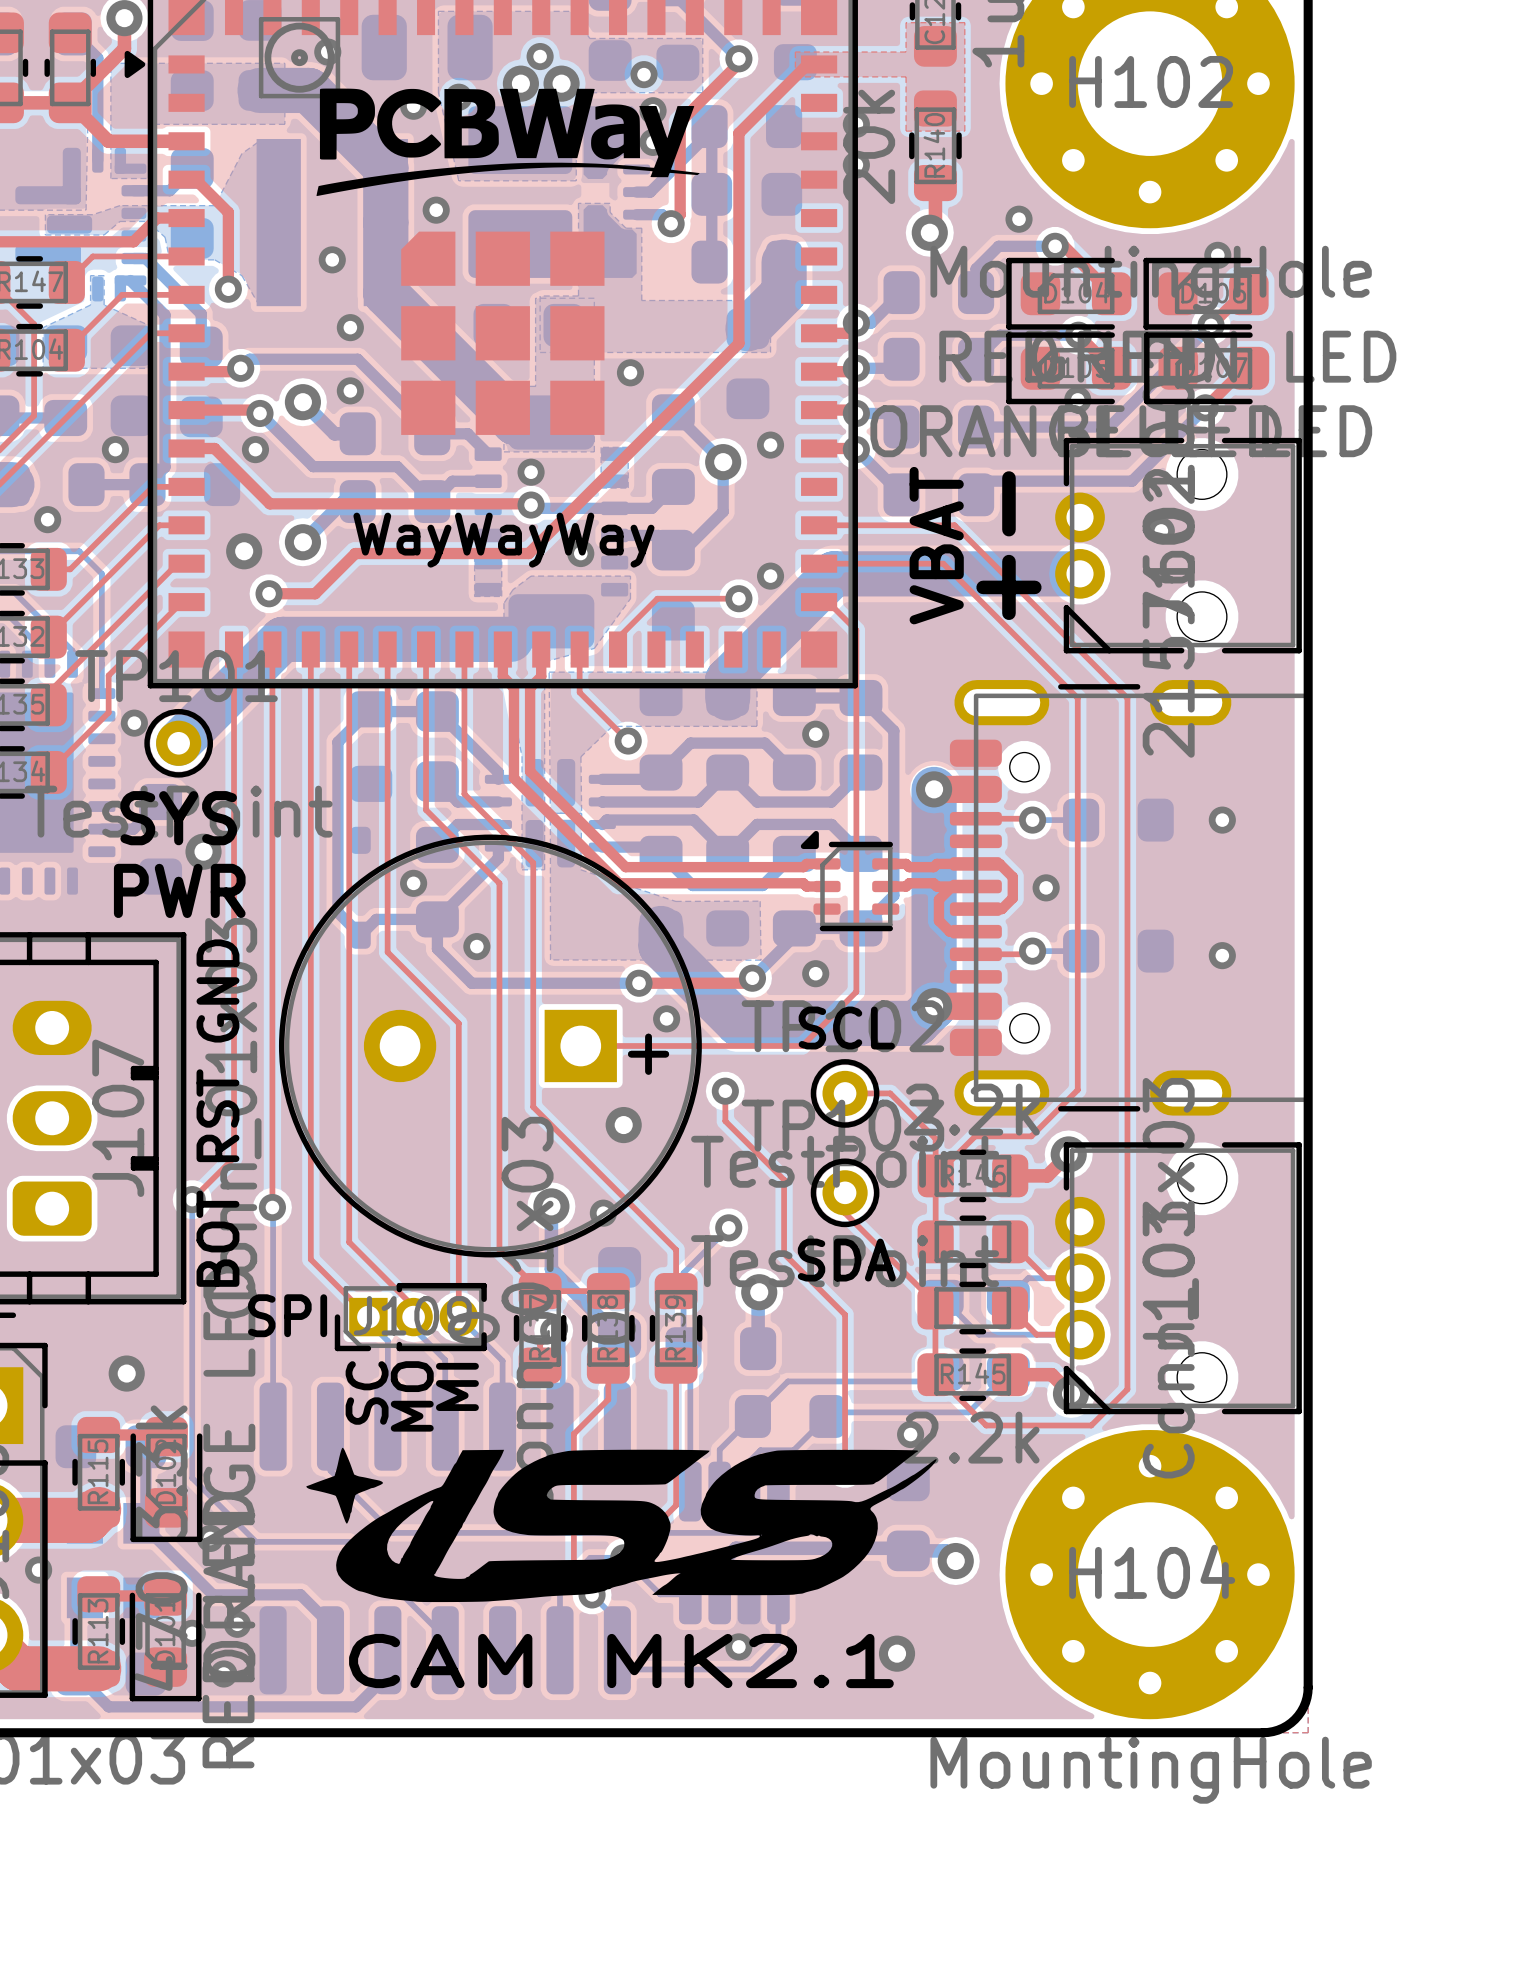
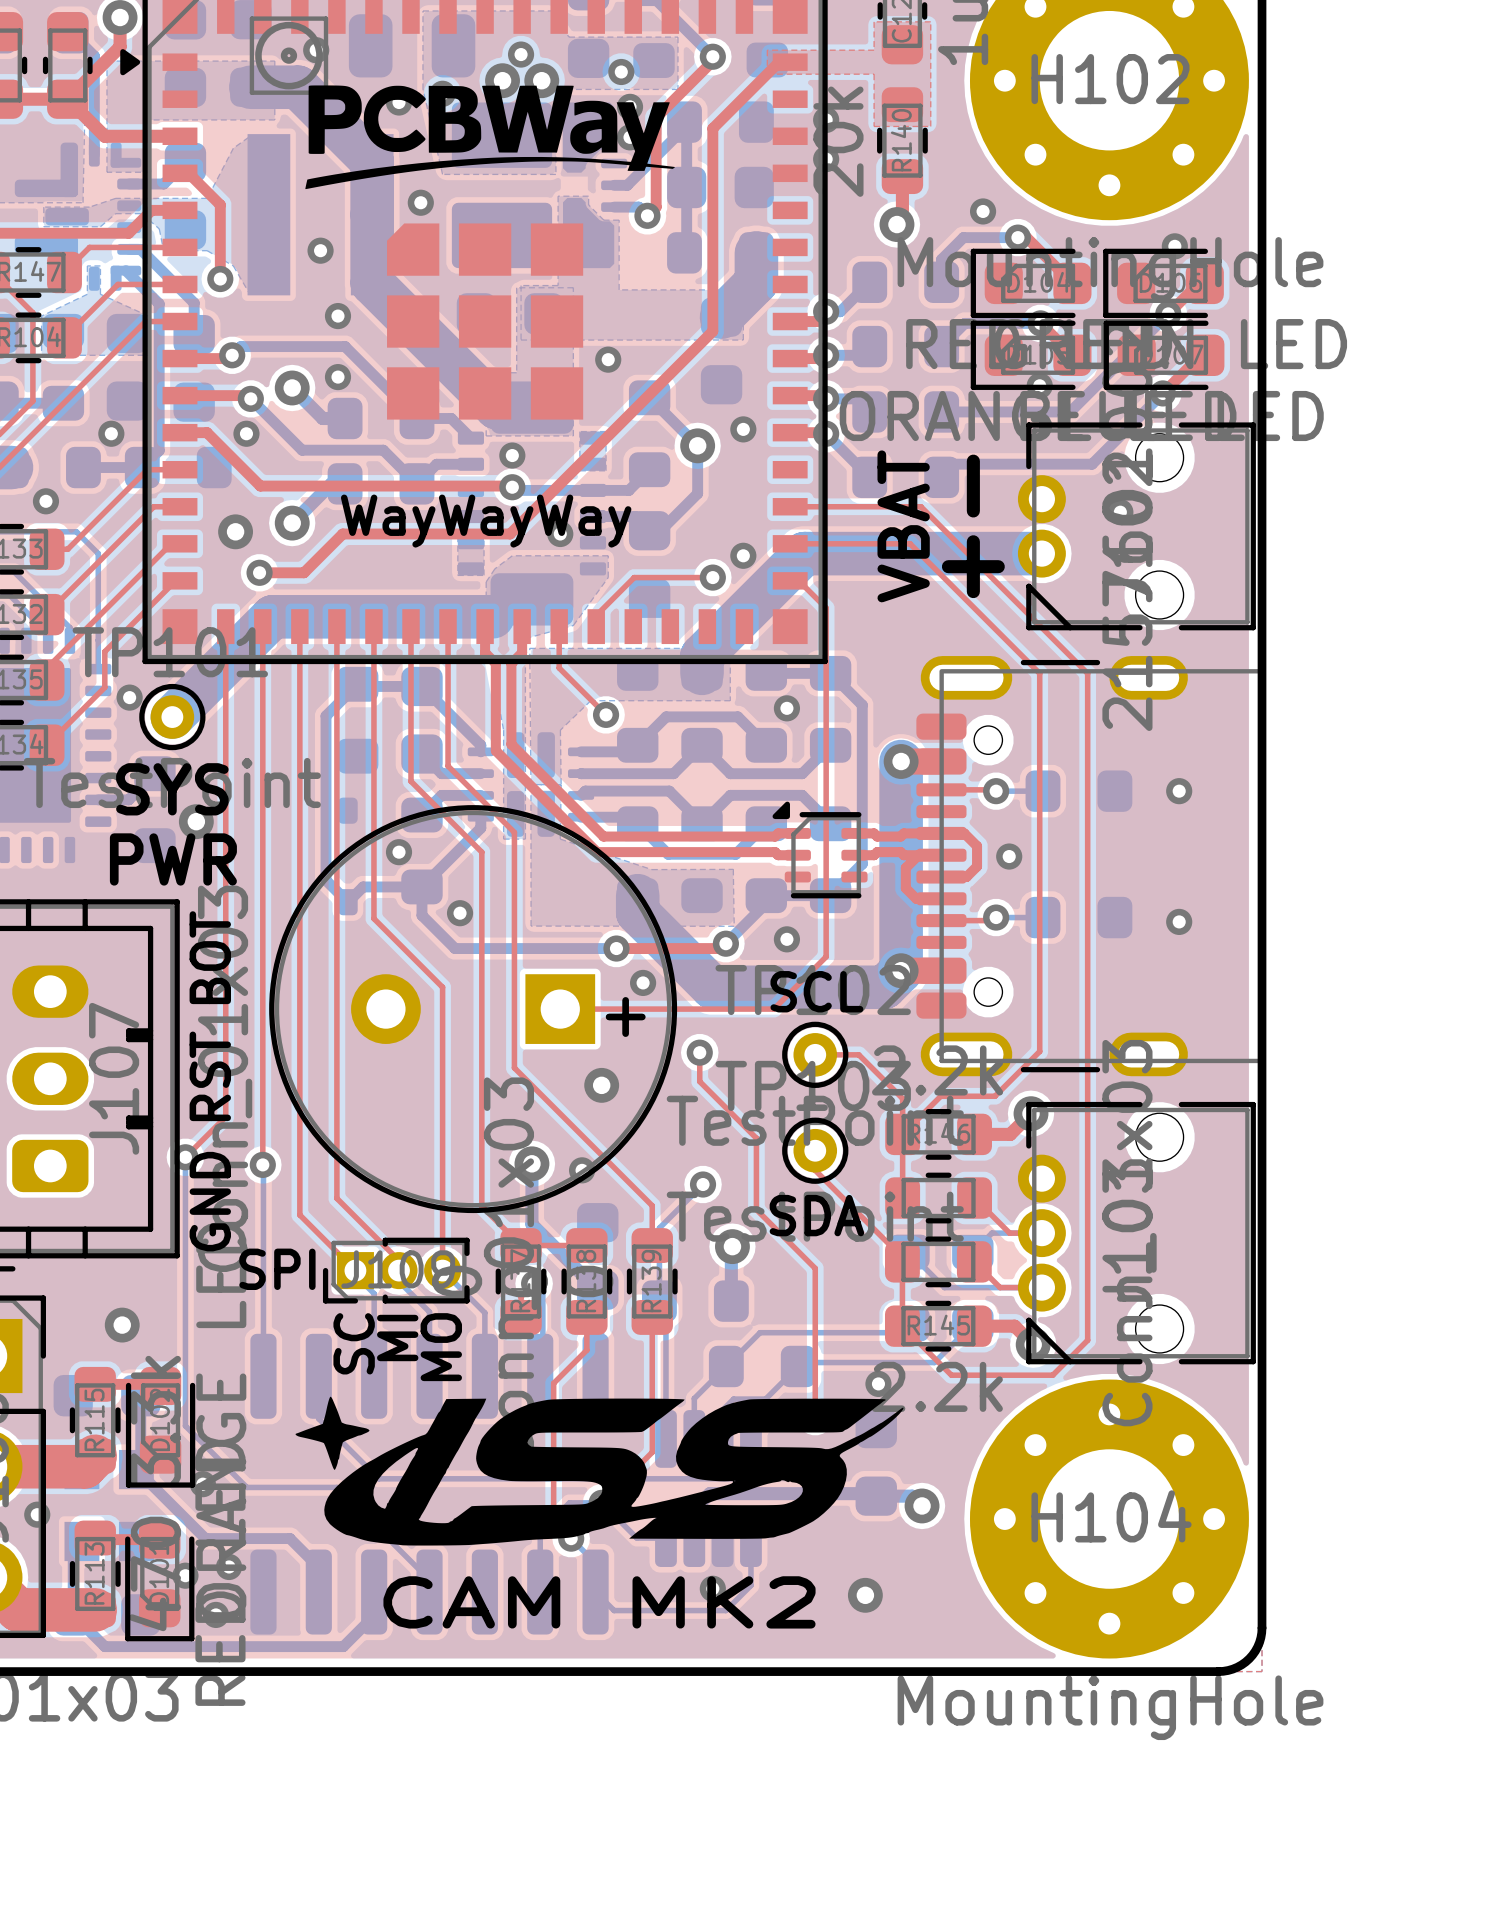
text: GND (217, 990) -> BOT (210, 957)
text: BOT (217, 1238) -> GND (210, 1201)
text position: MI (457, 1386) -> MI (397, 1337)
text position: MO (412, 1396) -> MO (441, 1347)
text: CAM MK2.1 (621, 1661) -> CAM MK2 (599, 1602)

